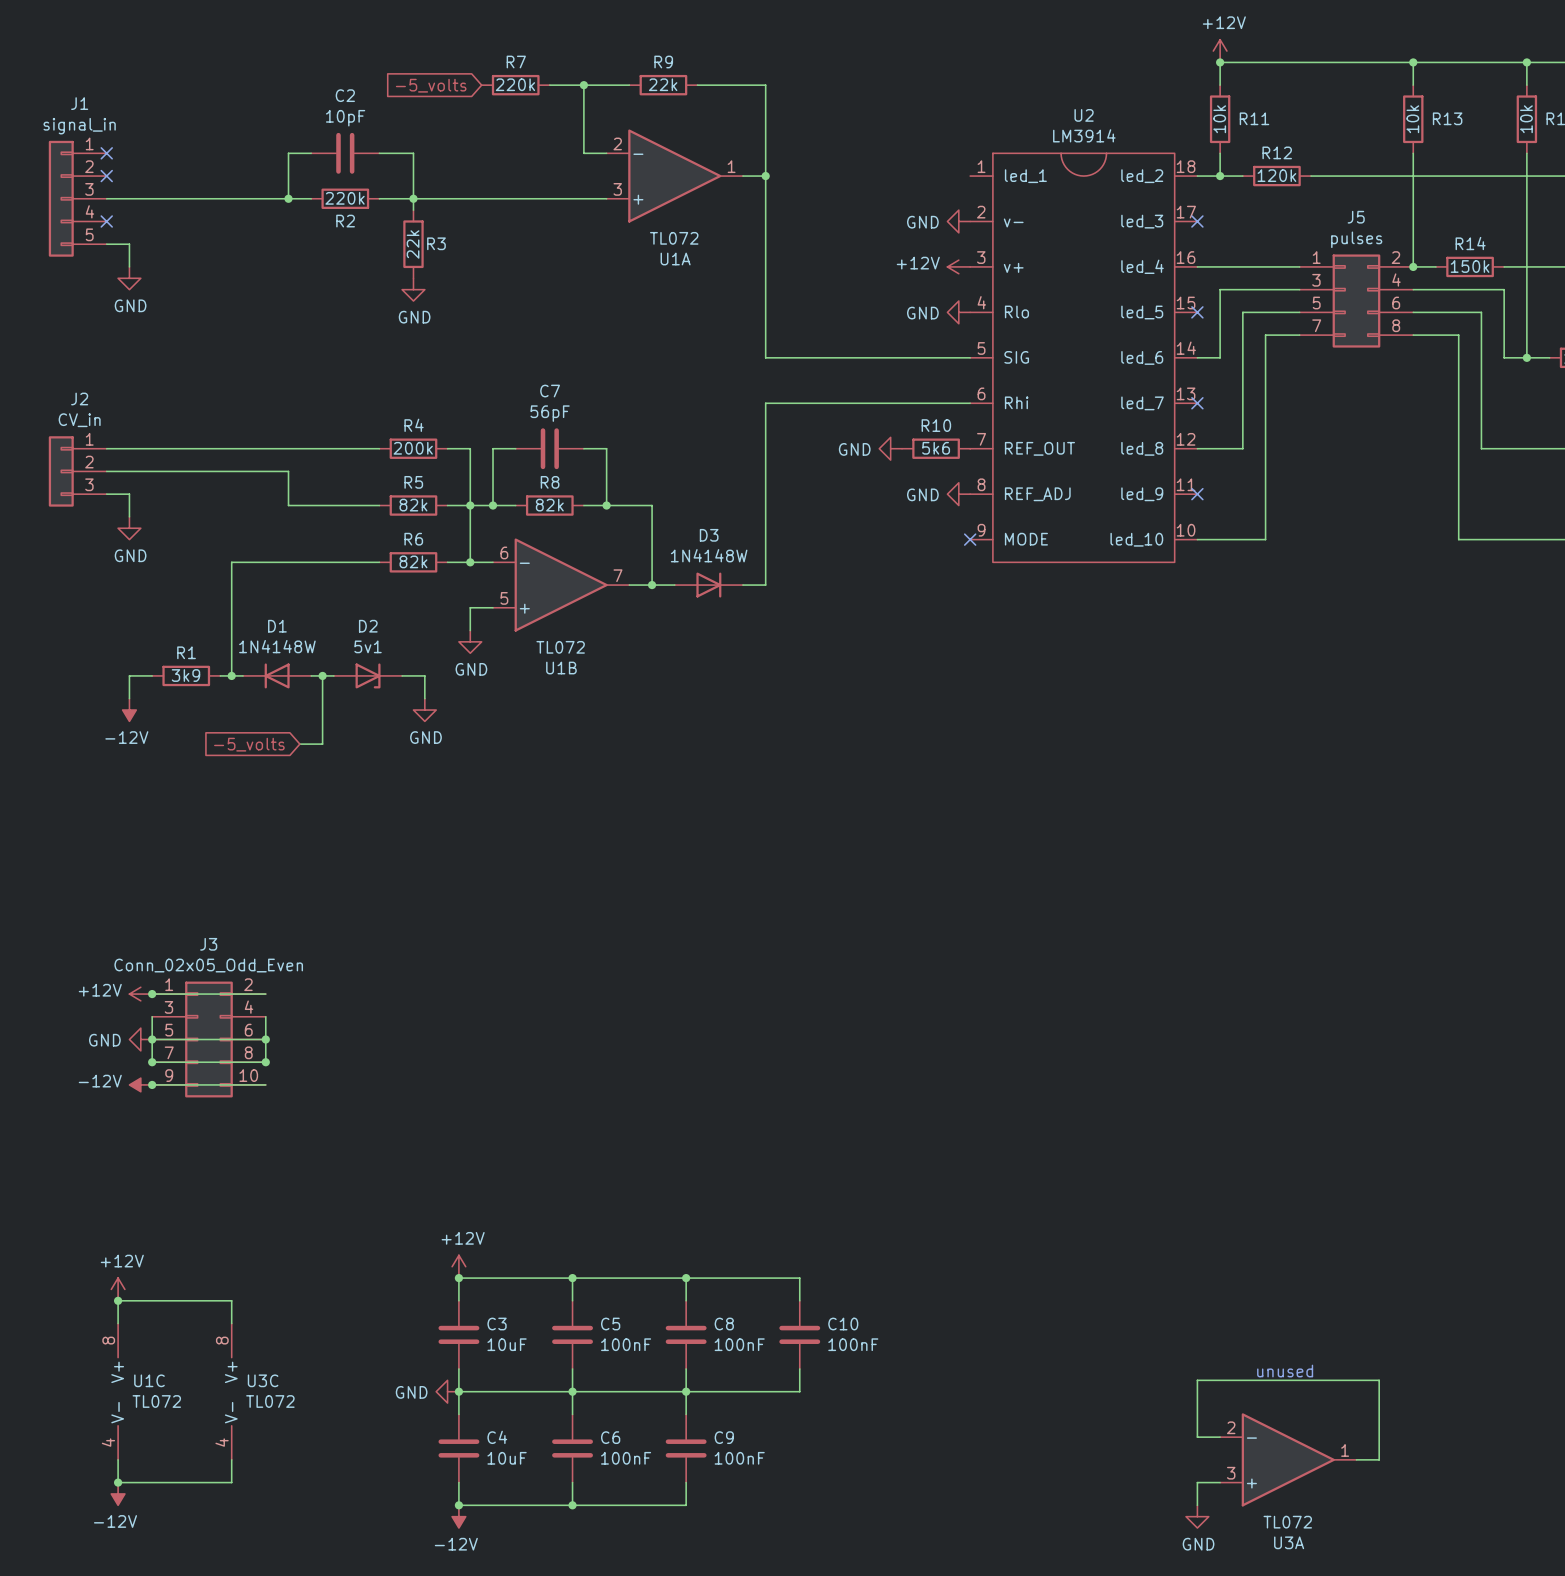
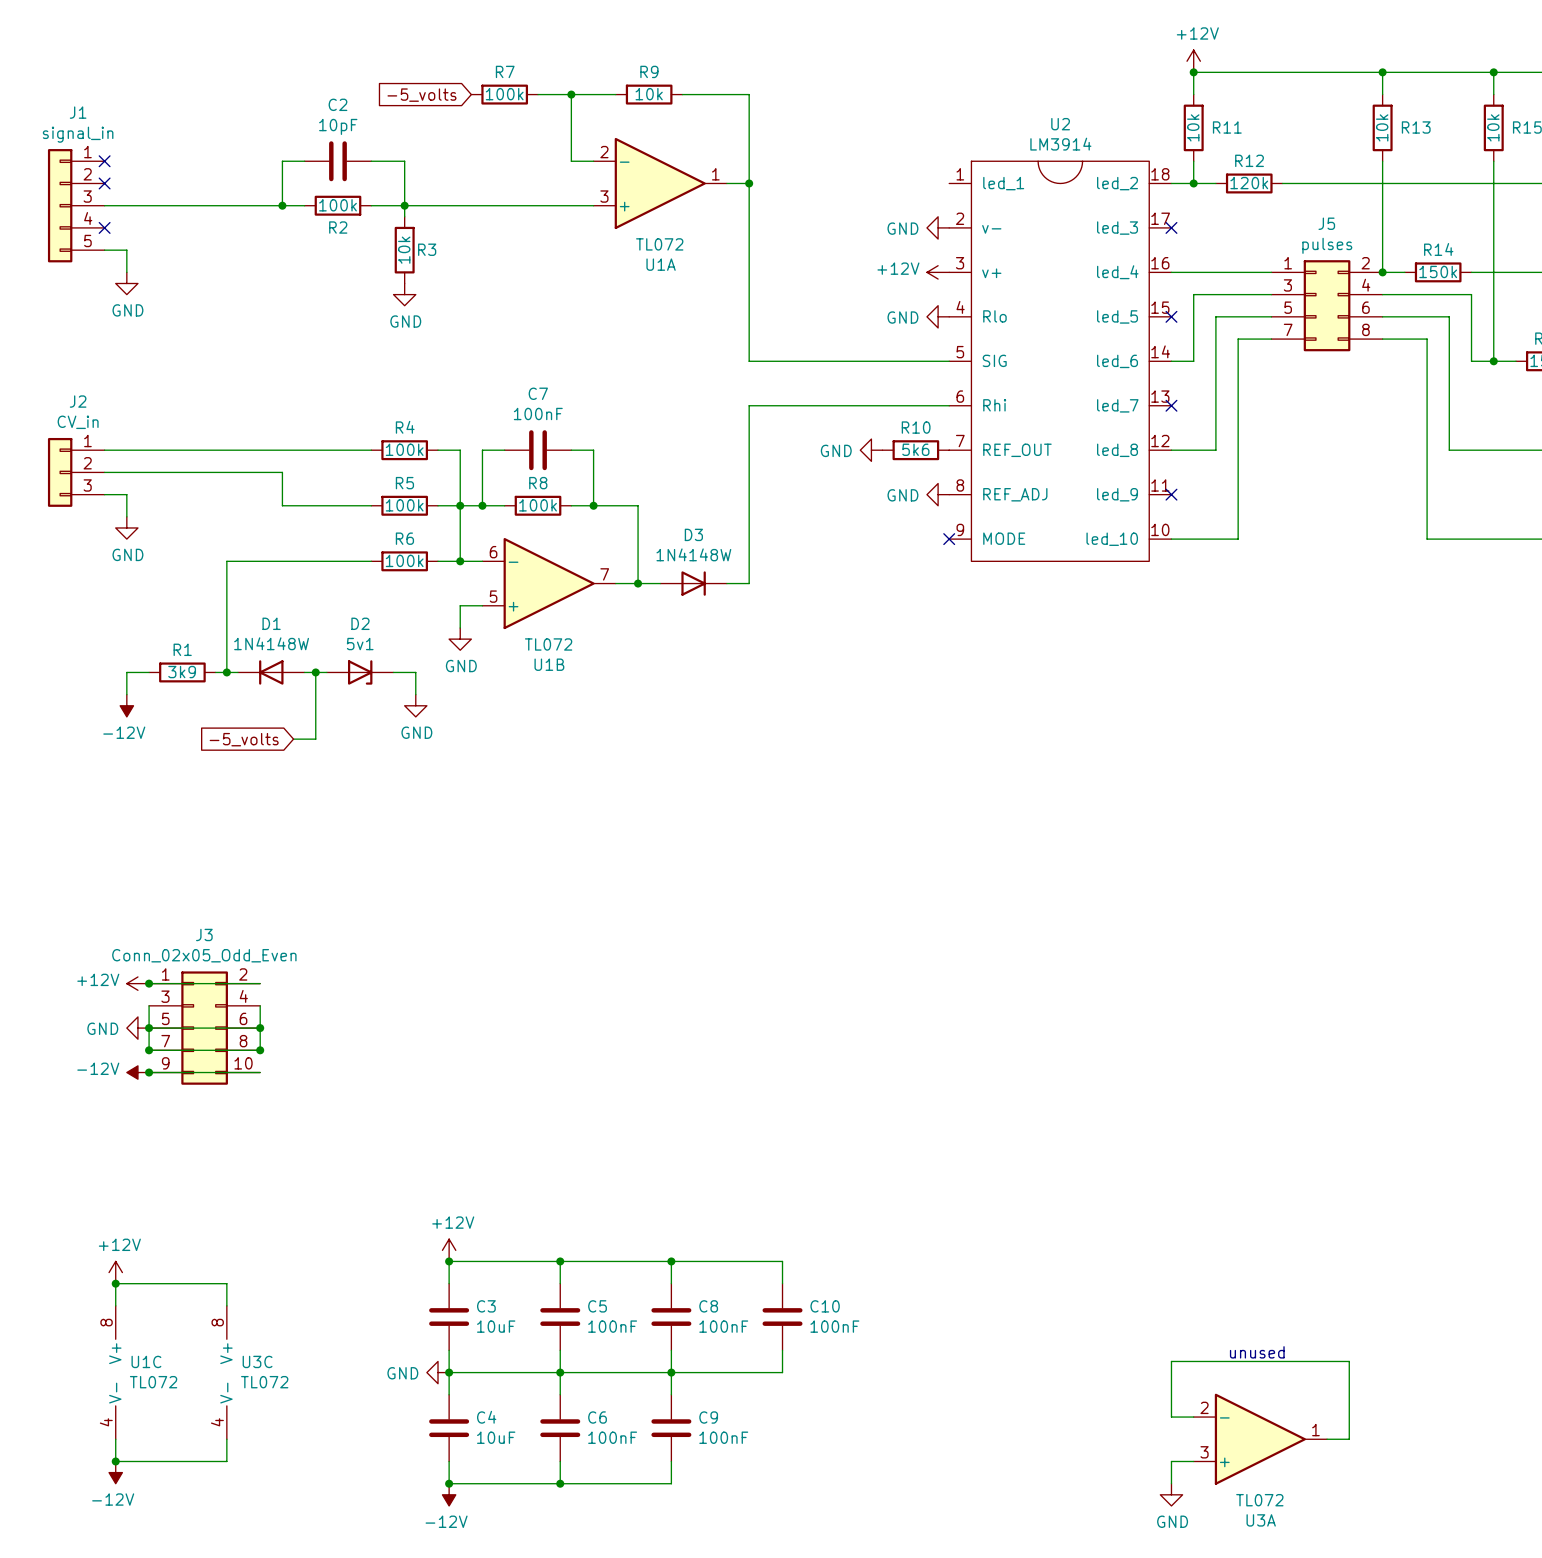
R7 value: 220k (515, 84) -> 100k (504, 94)
R9 value: 22k (663, 84) -> 10k (649, 94)
R2 value: 220k (345, 198) -> 100k (337, 205)
R3 value: 22k (413, 244) -> 10k (404, 250)
C7 value: 56pF (550, 413) -> 100nF (538, 413)
R4 value: 200k (413, 448) -> 100k (404, 449)
R5 value: 82k (413, 505) -> 100k (404, 505)
R8 value: 82k (549, 505) -> 100k (538, 505)
R6 value: 82k (413, 561) -> 100k (404, 560)

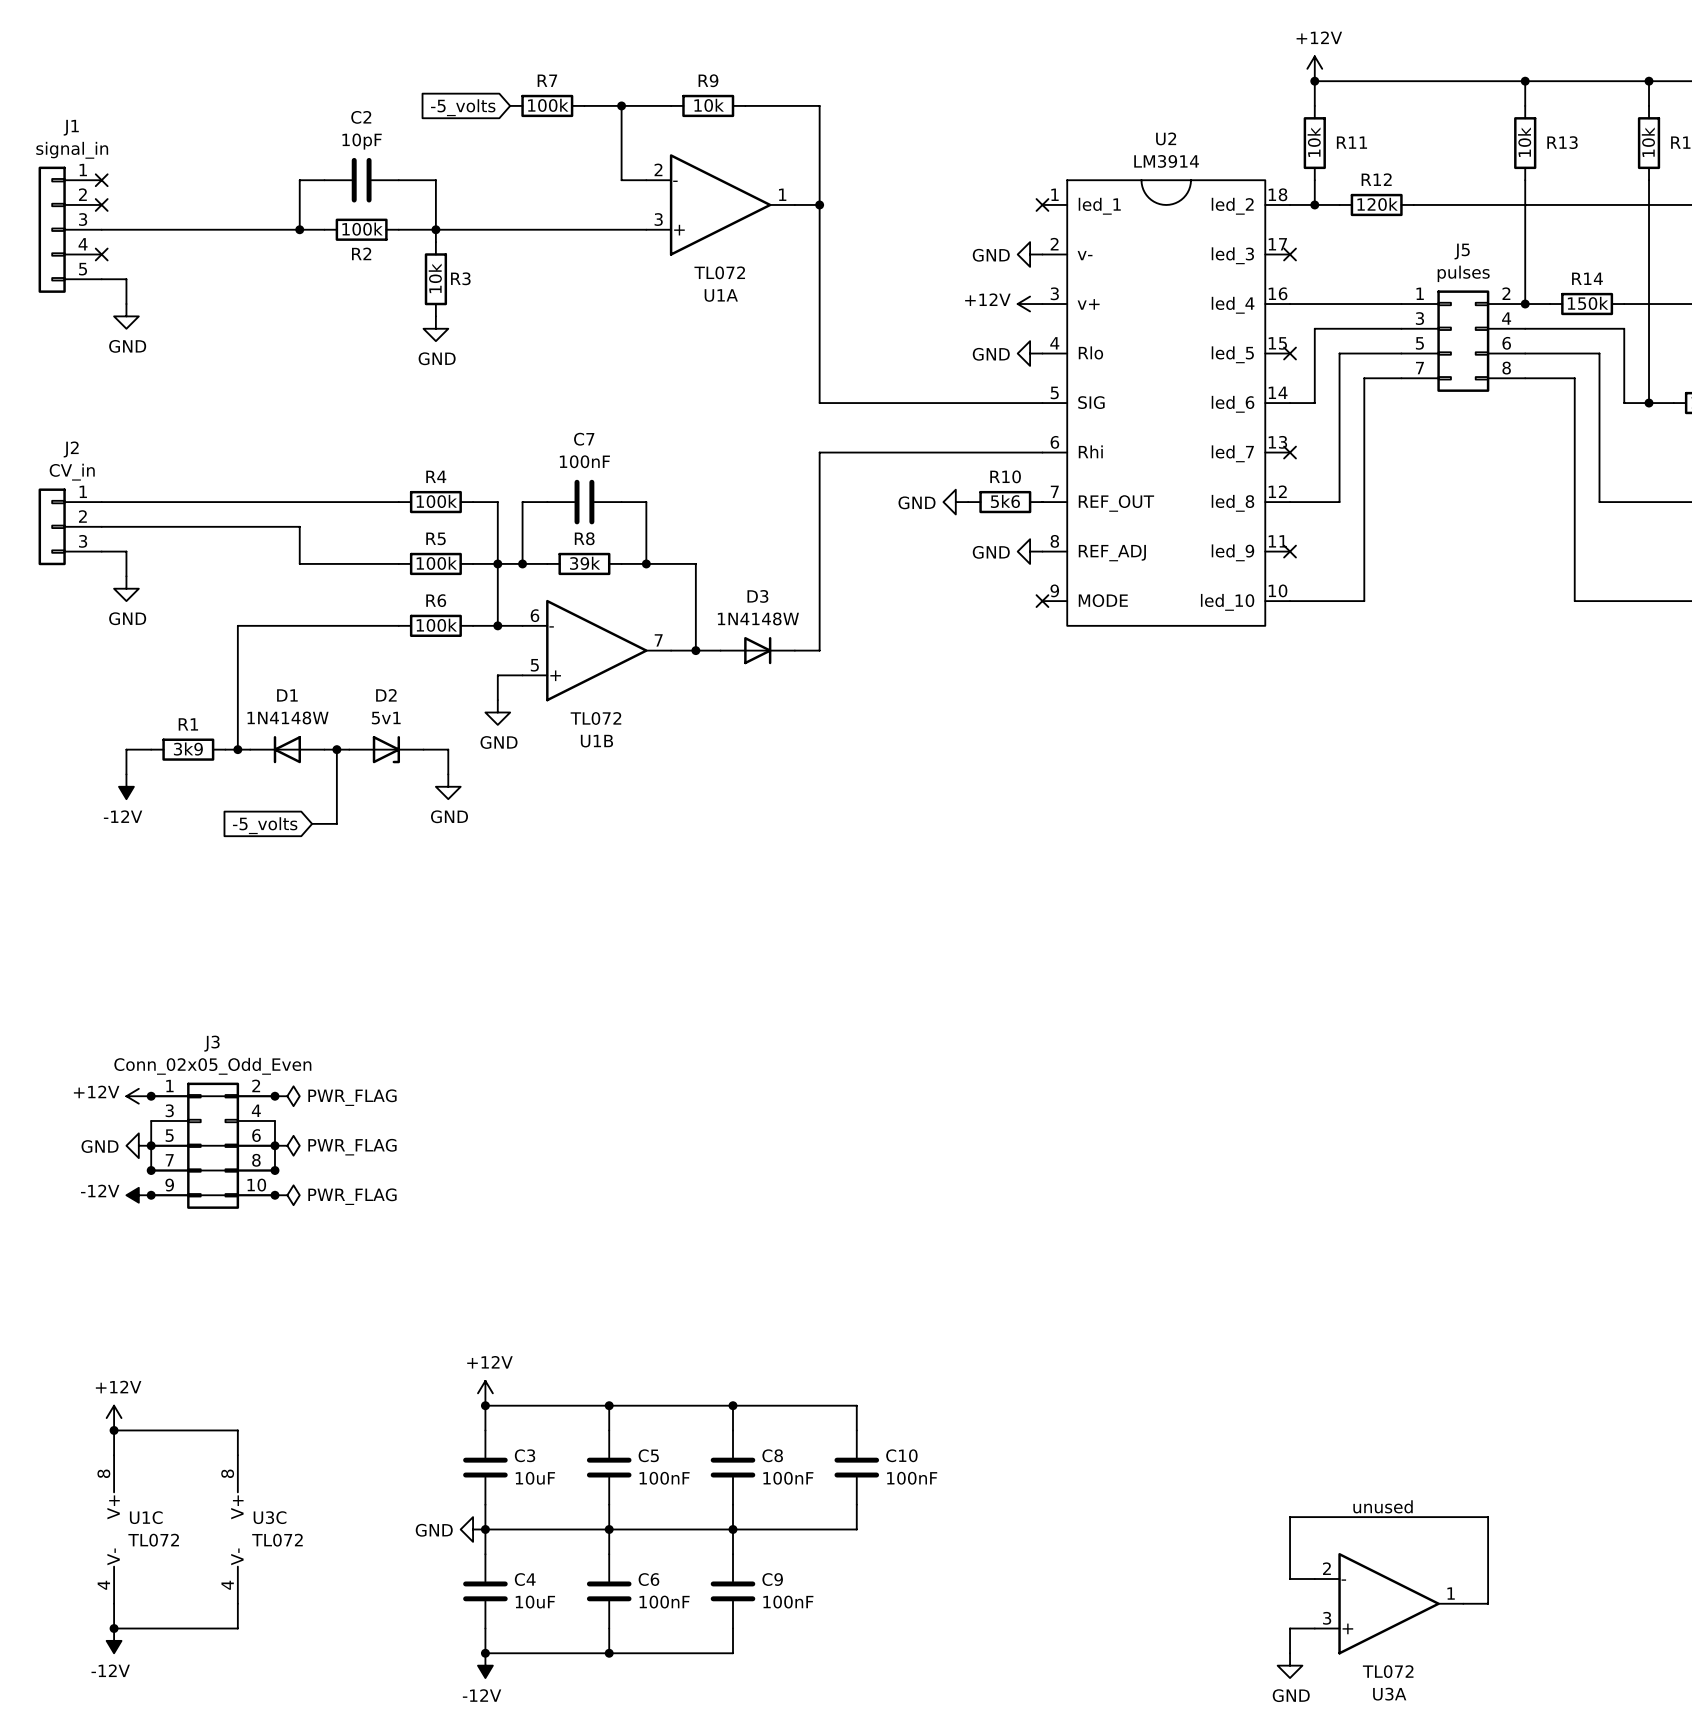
no-connect mark: none -> (1042, 204)
R8 value: 100k (538, 505) -> 39k (585, 563)
junction: none -> (274, 1096)
power symbol: none -> PWR_FLAG (287, 1096)
power symbol: none -> PWR_FLAG (287, 1145)
junction: none -> (274, 1195)
power symbol: none -> PWR_FLAG (287, 1195)

